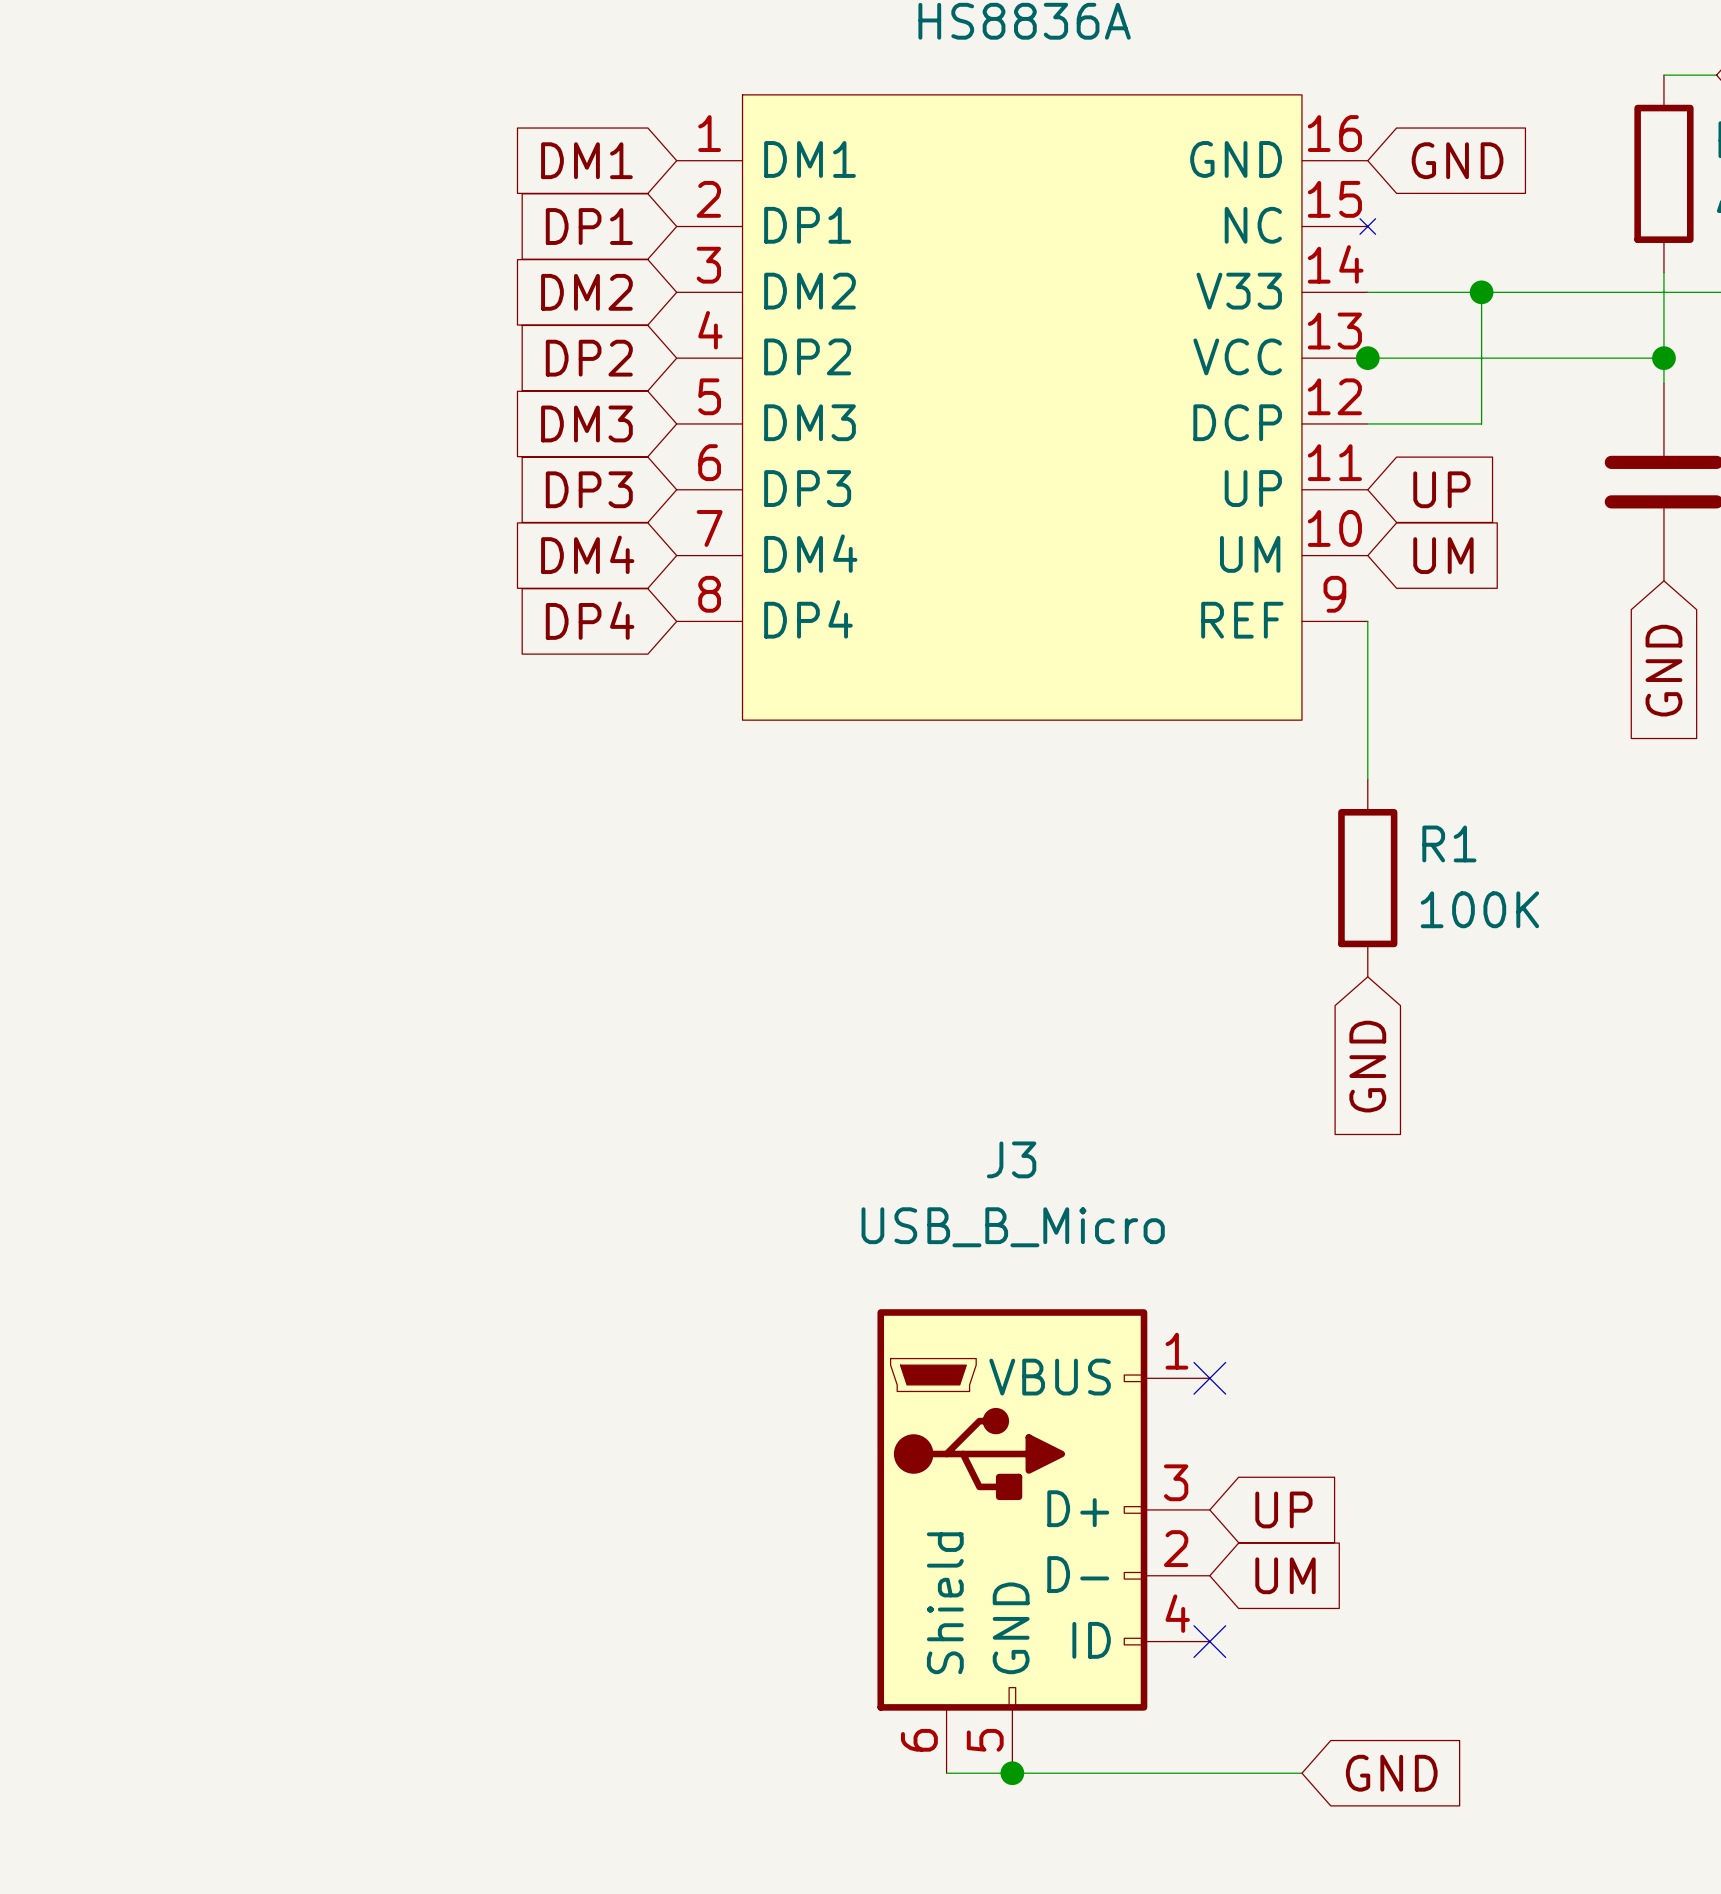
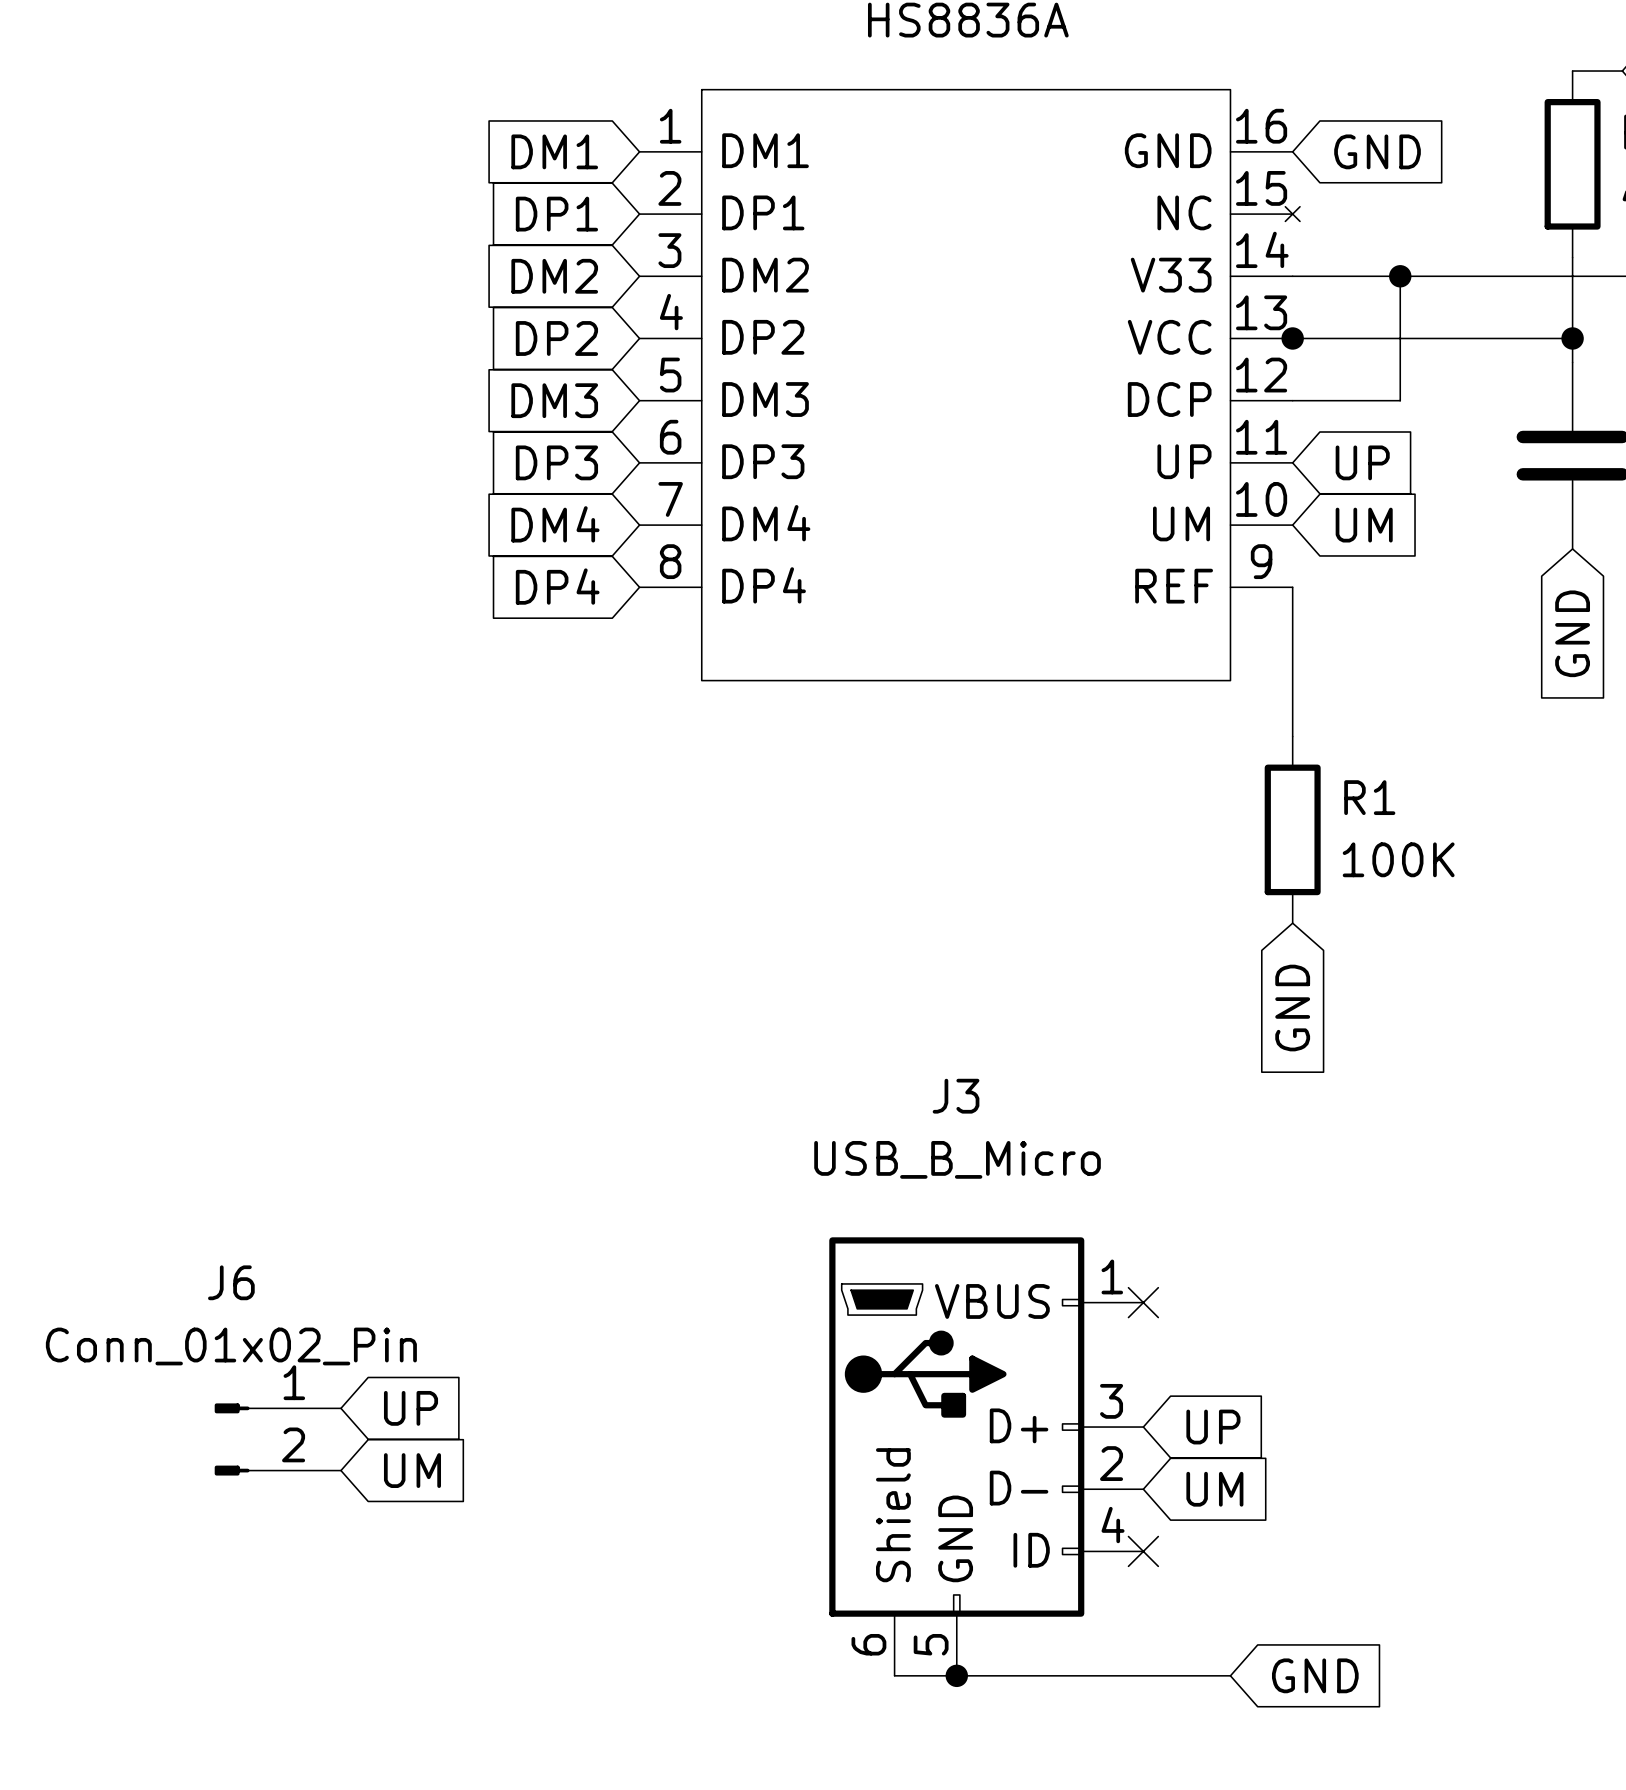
global label: none -> UP (411, 1408)
J6: none -> Conn_01x02_Pin (277, 1439)
global label: none -> UM (412, 1470)

